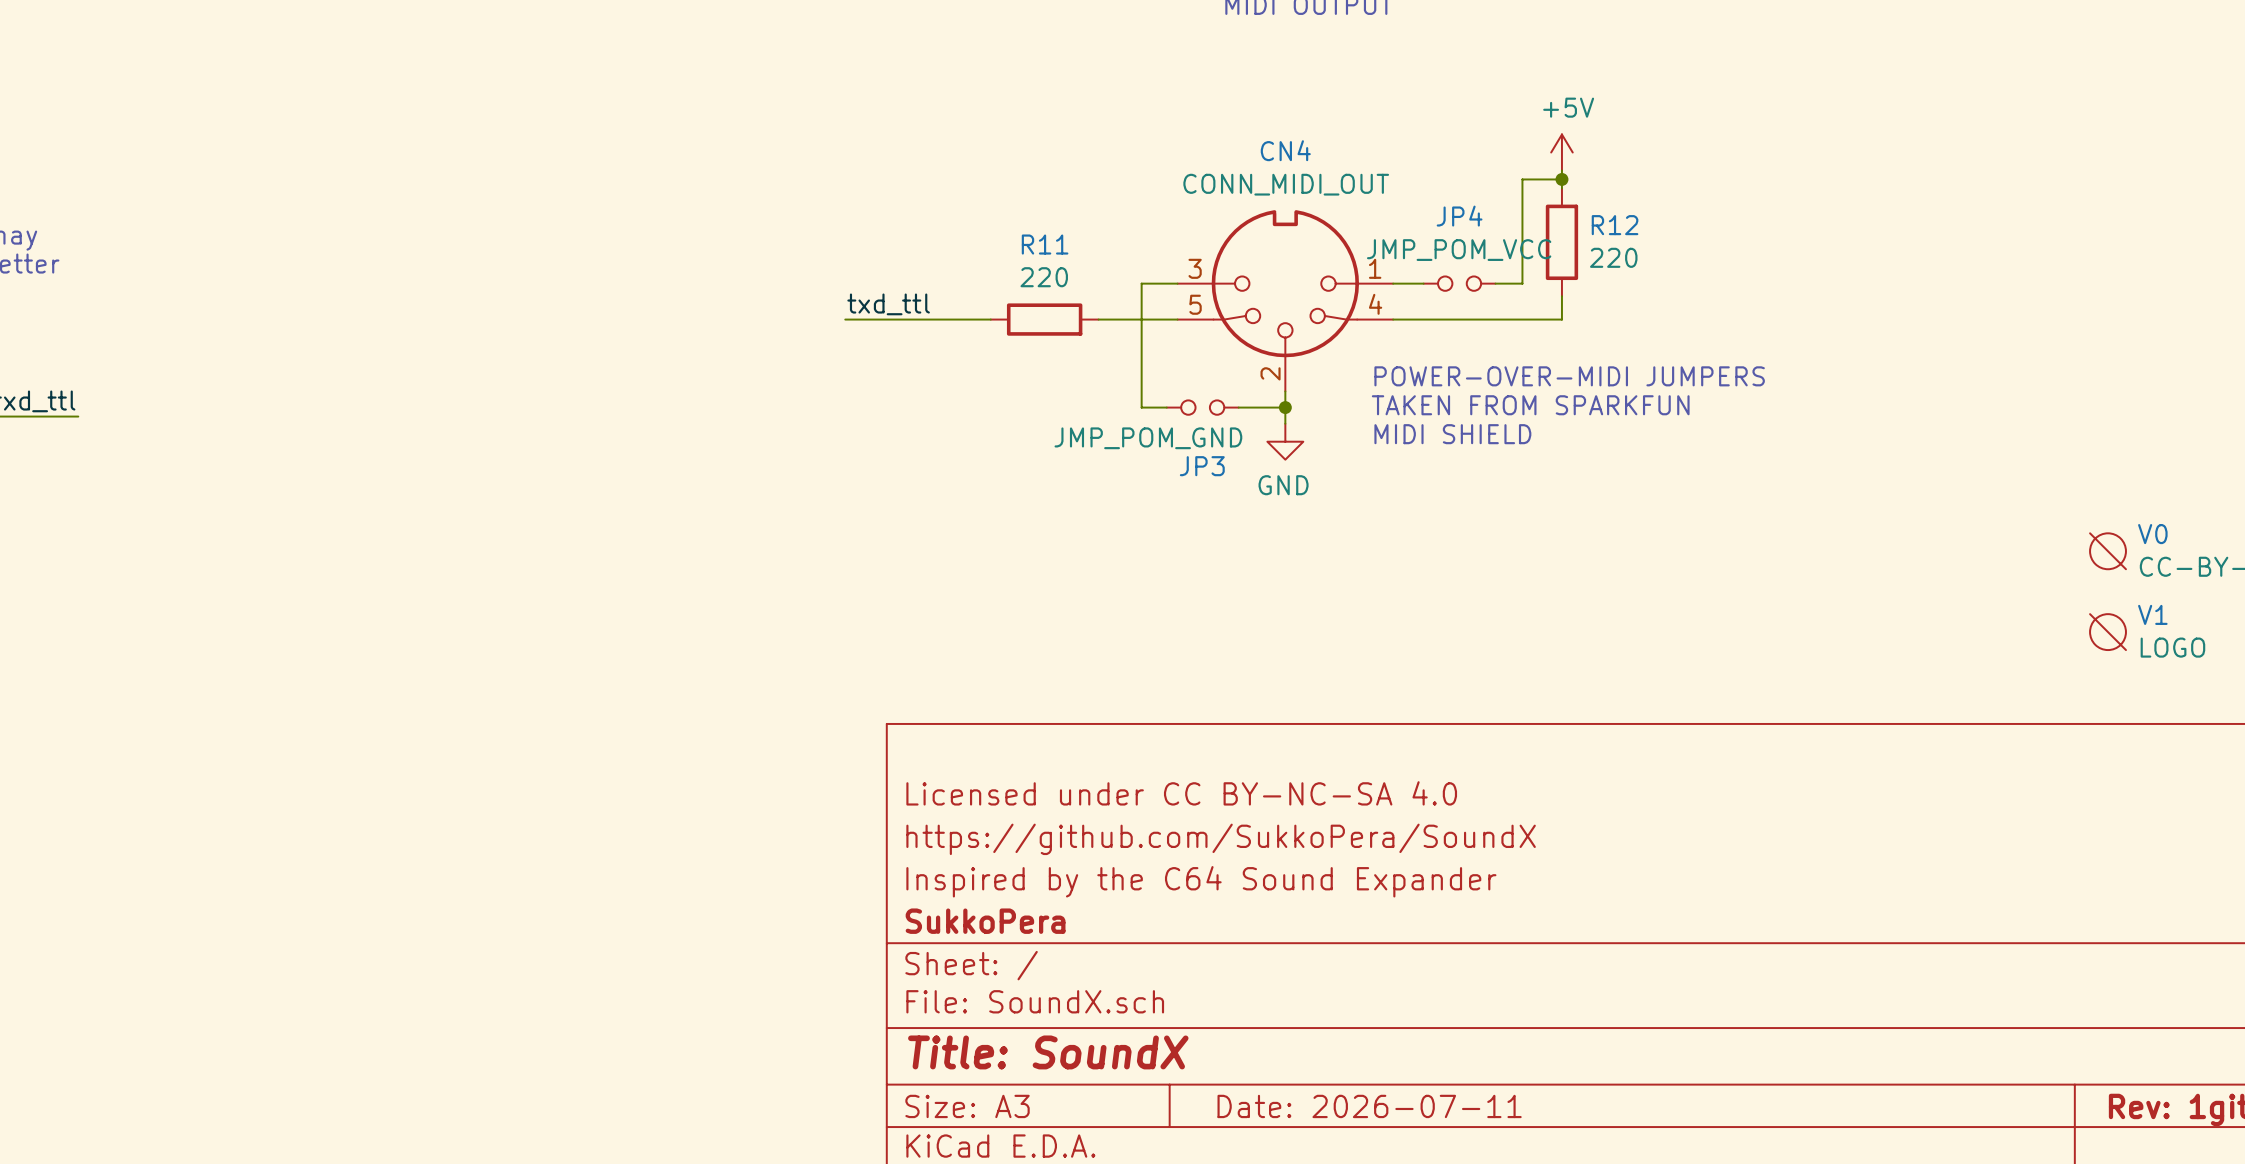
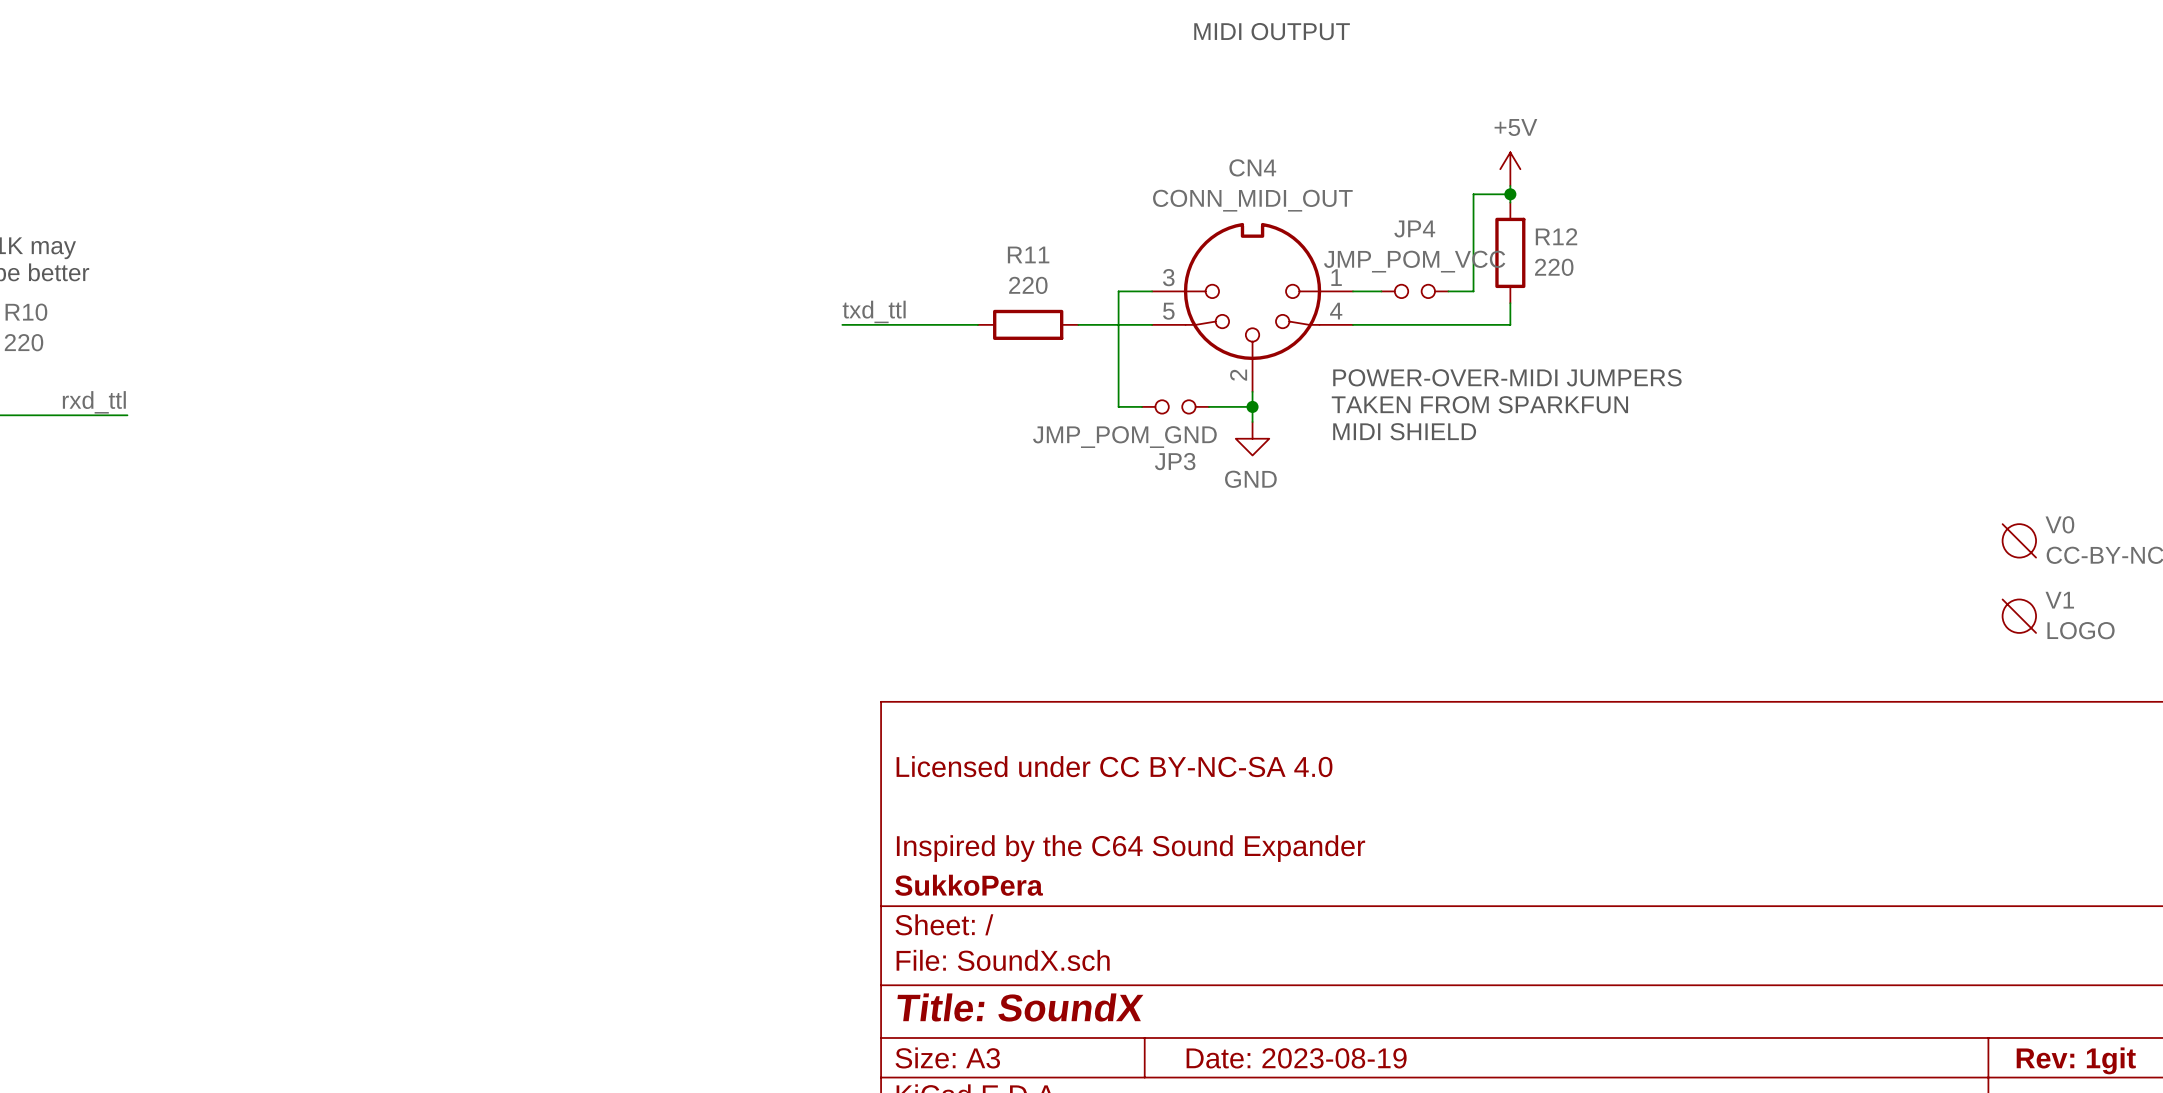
title block: https://github.com/SukkoPera/SoundX (1221, 839) -> none
title block: Date: 2026-07-11 (1369, 1106) -> Date: 2023-08-19 (1296, 1058)

